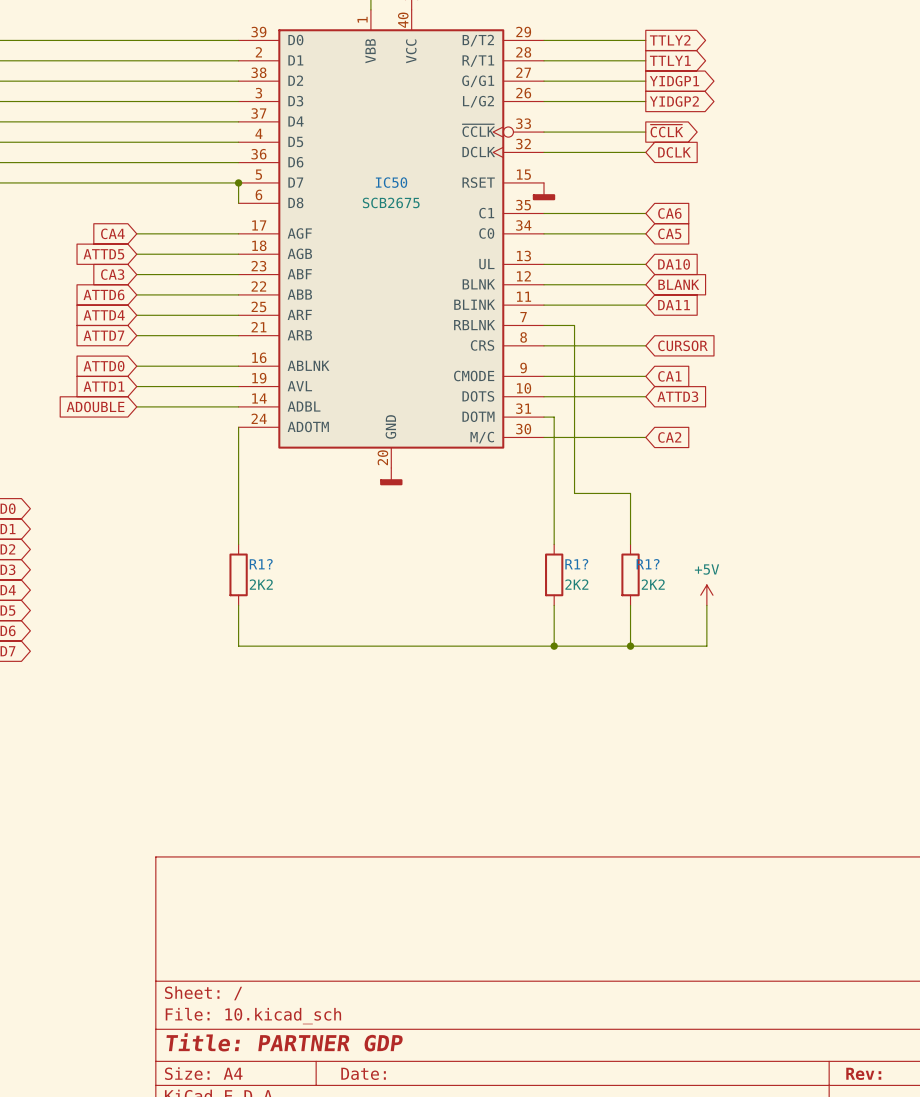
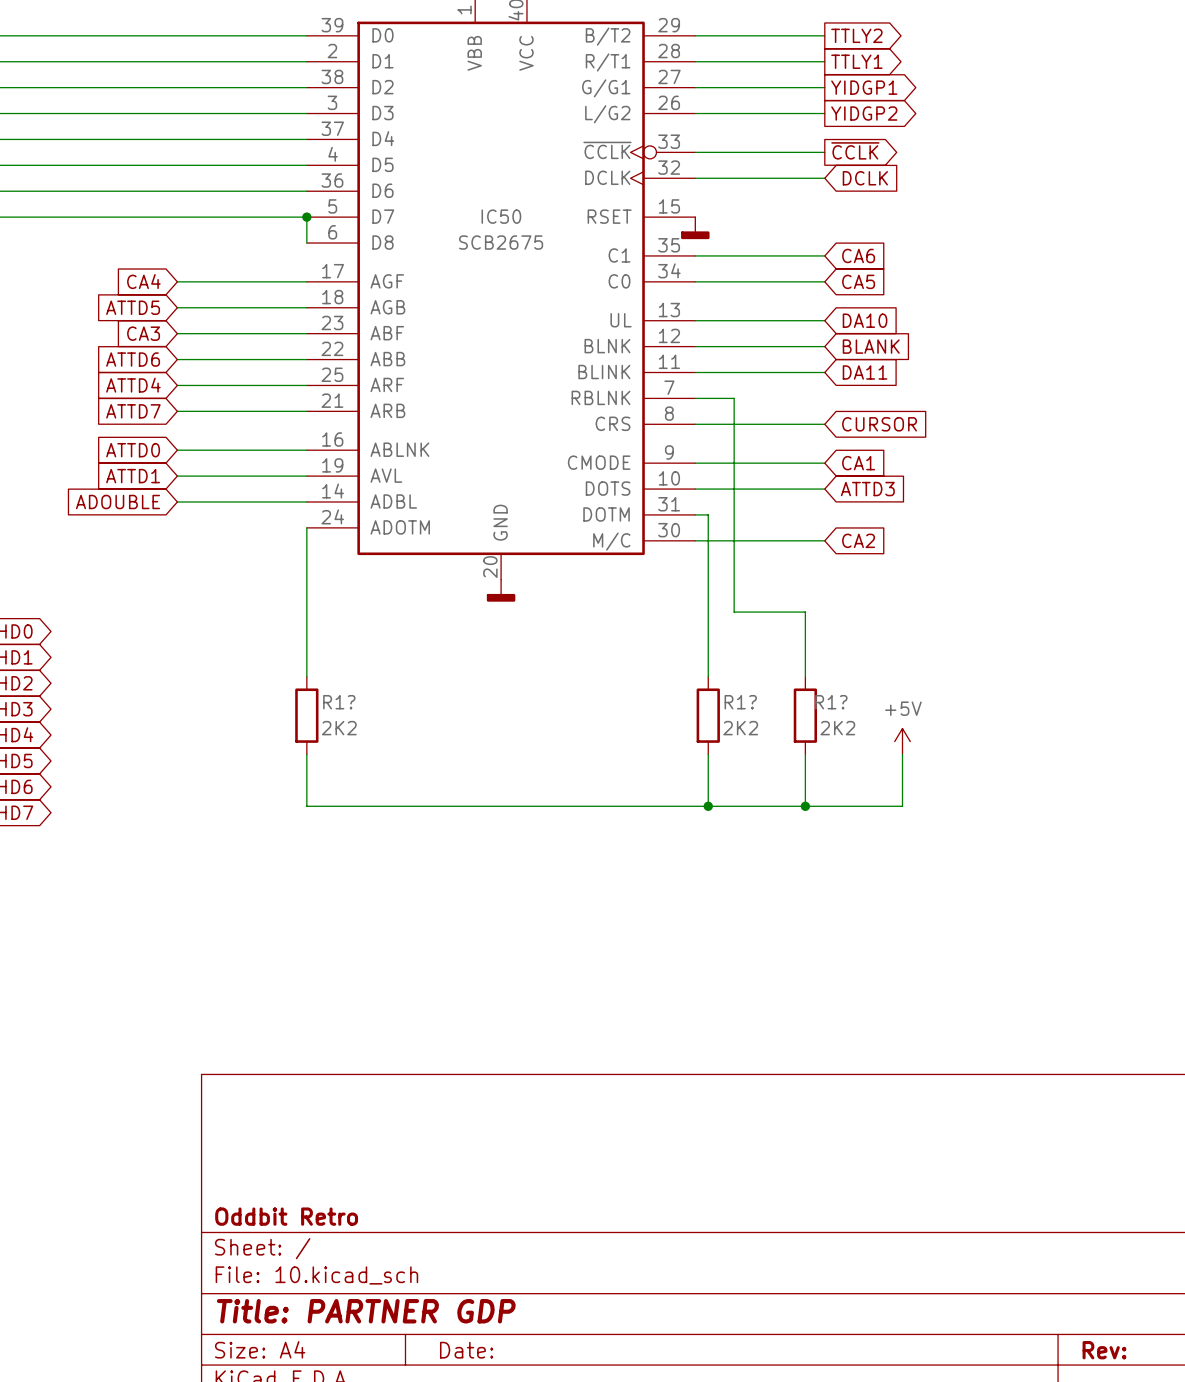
title block: none -> Oddbit Retro (286, 1216)

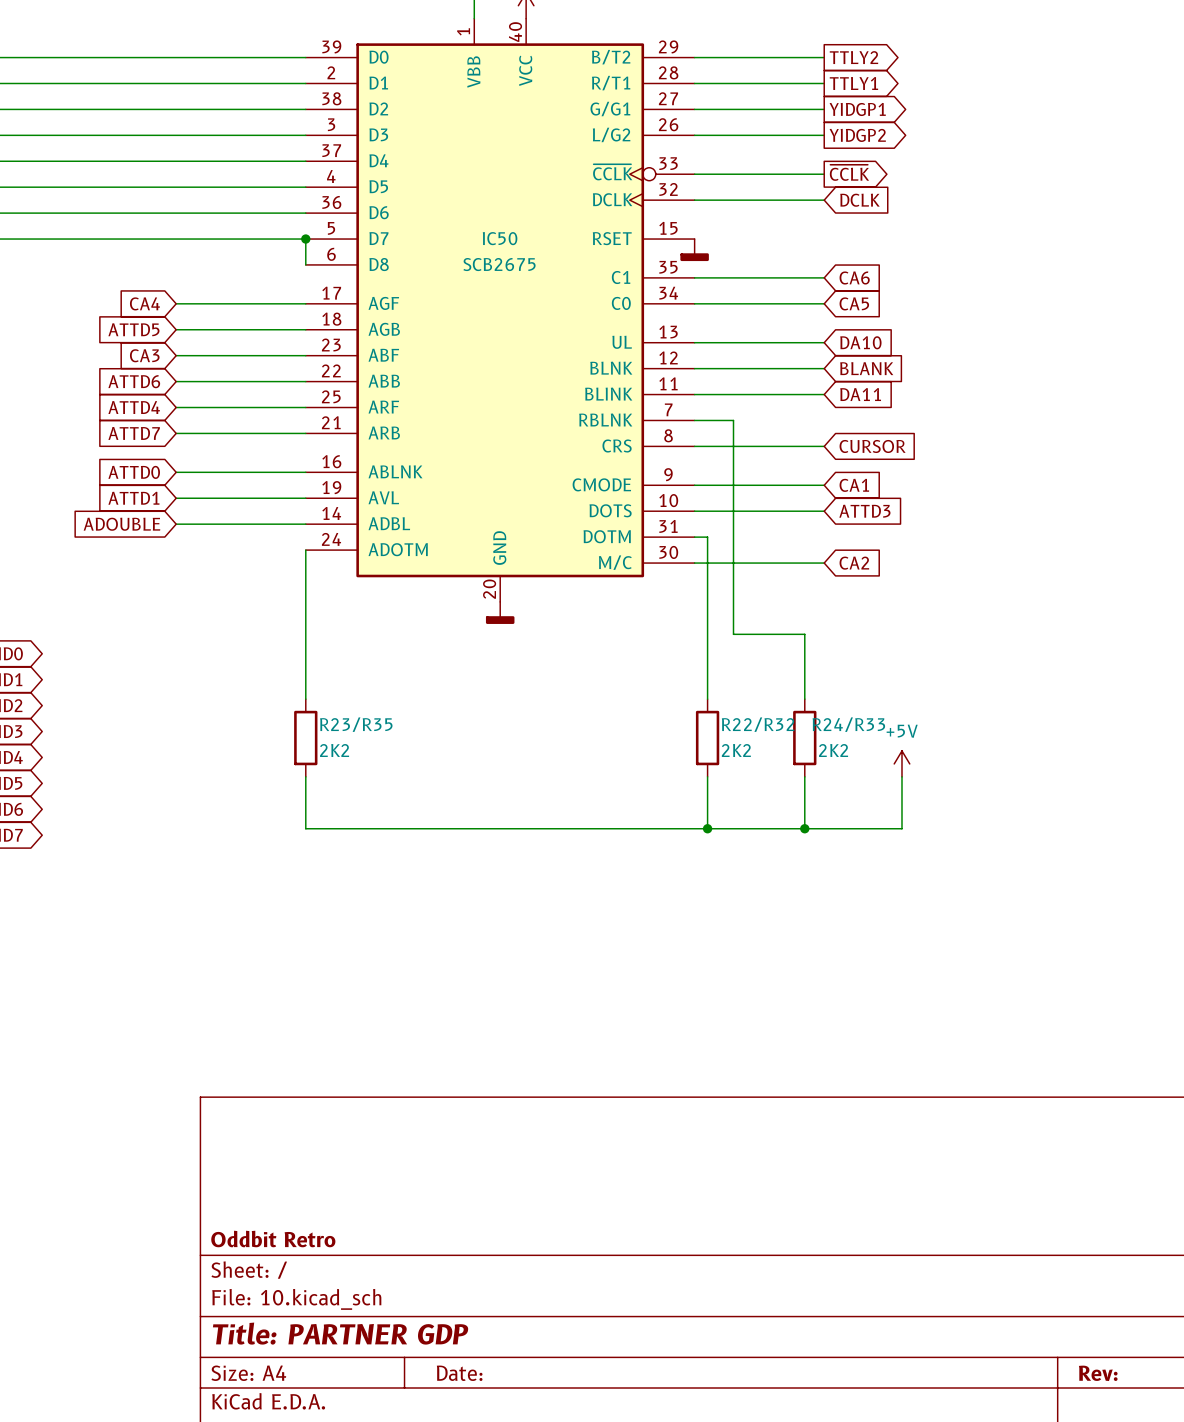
R1? name: R1? (339, 702) -> R23/R35 (356, 724)
R1? name: R1? (740, 702) -> R22/R32 (758, 724)
R1? name: R1? (831, 702) -> R24/R33 (848, 724)

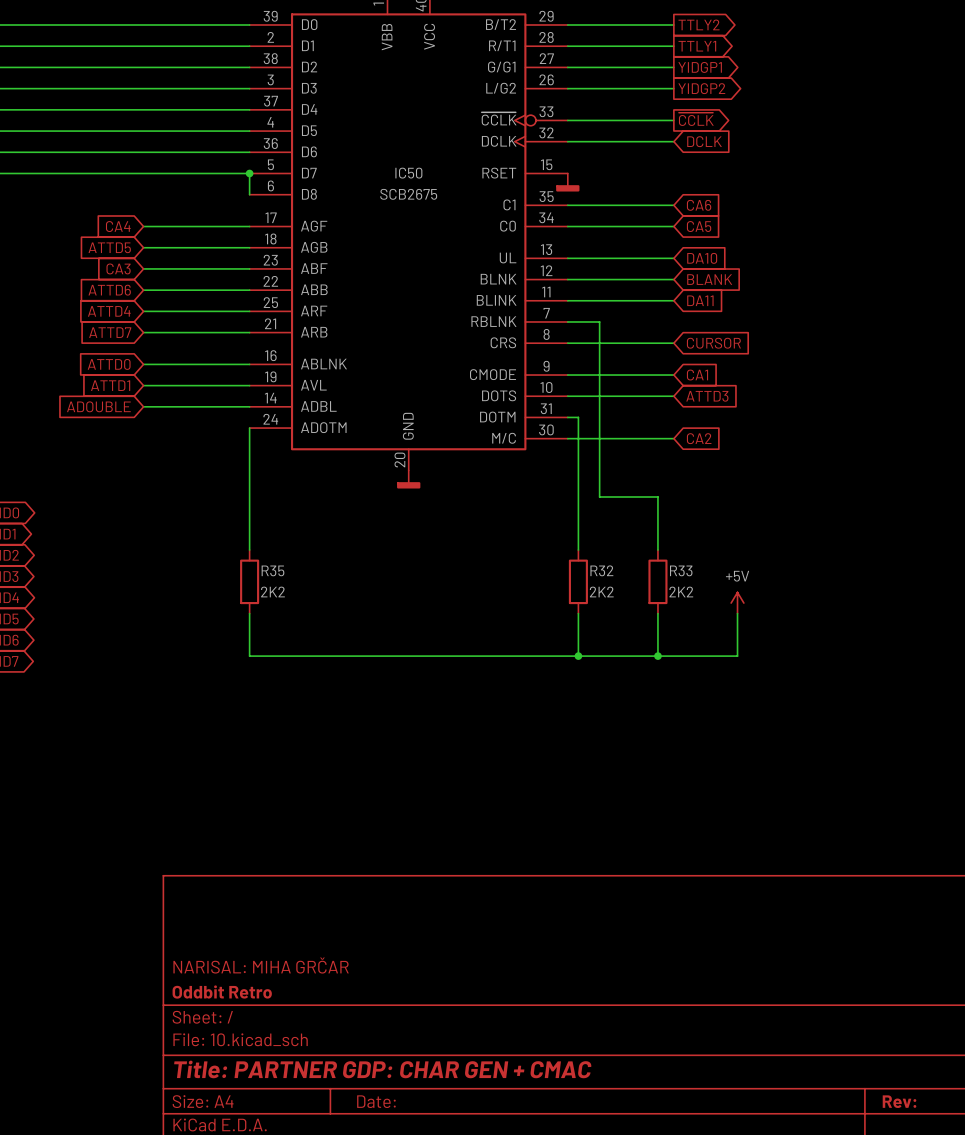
R23/R35 name: R23/R35 (356, 724) -> R35 (272, 570)
R22/R32 name: R22/R32 (758, 724) -> R32 (601, 570)
R24/R33 name: R24/R33 (848, 724) -> R33 (681, 570)
title block: none -> NARISAL: MIHA GRČAR (261, 965)
title block: Title: PARTNER GDP (340, 1333) -> Title: PARTNER GDP: CHAR GEN + CMAC (382, 1069)

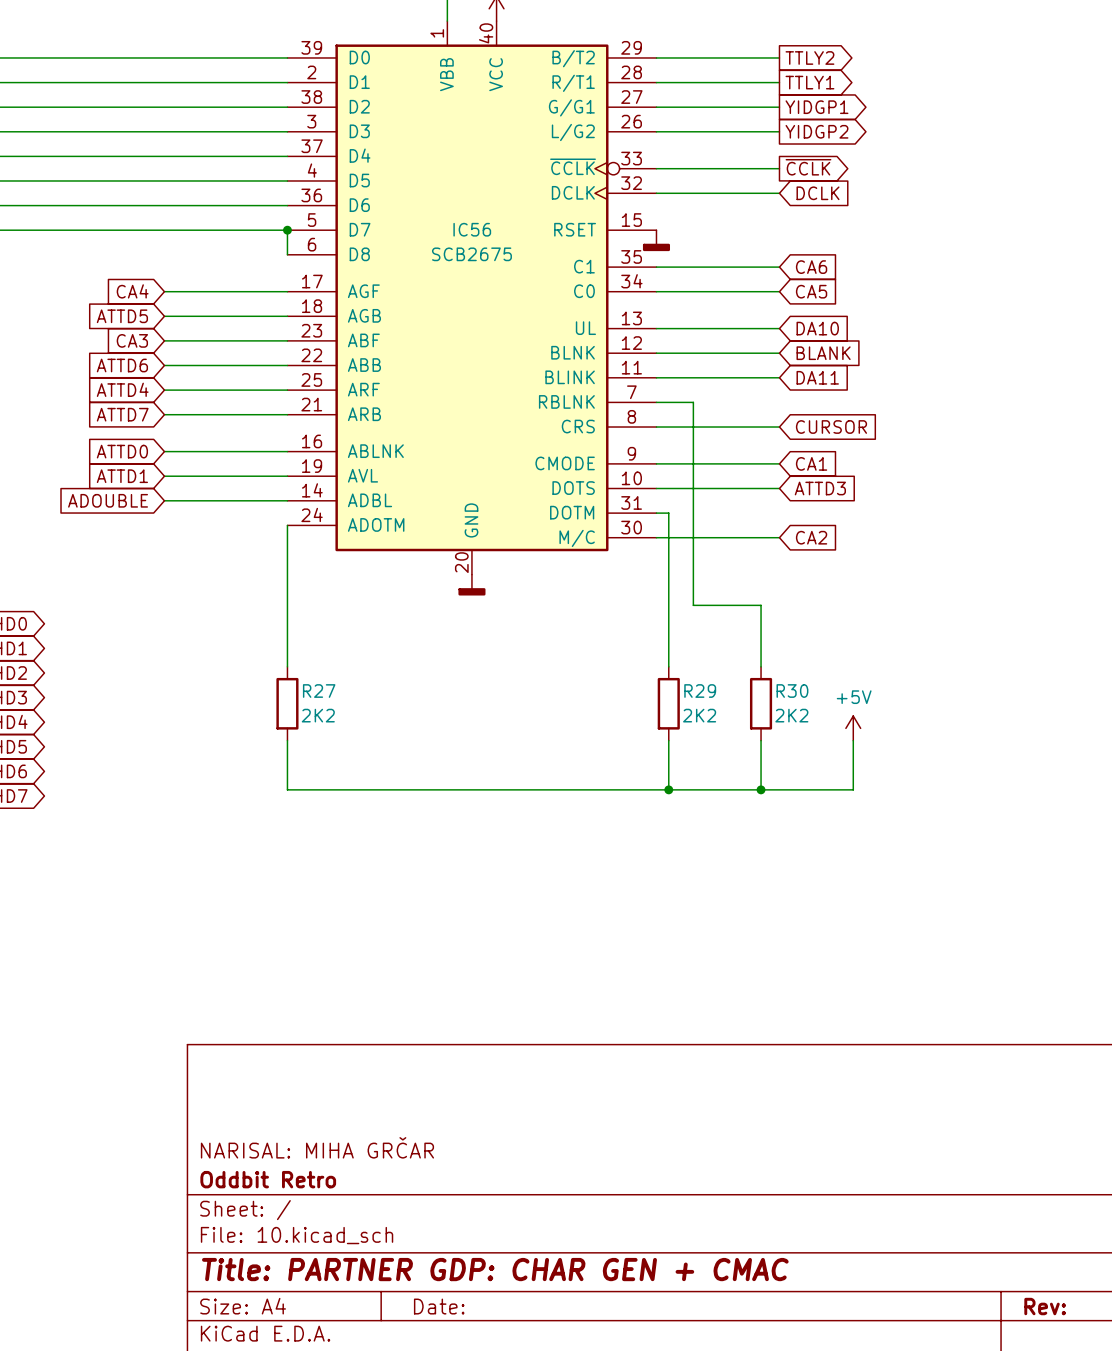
IC50 name: IC50 (408, 173) -> IC56 (472, 229)
R35 name: R35 (272, 570) -> R27 (319, 691)
R32 name: R32 (601, 570) -> R29 (700, 691)
R33 name: R33 (681, 570) -> R30 (792, 691)

